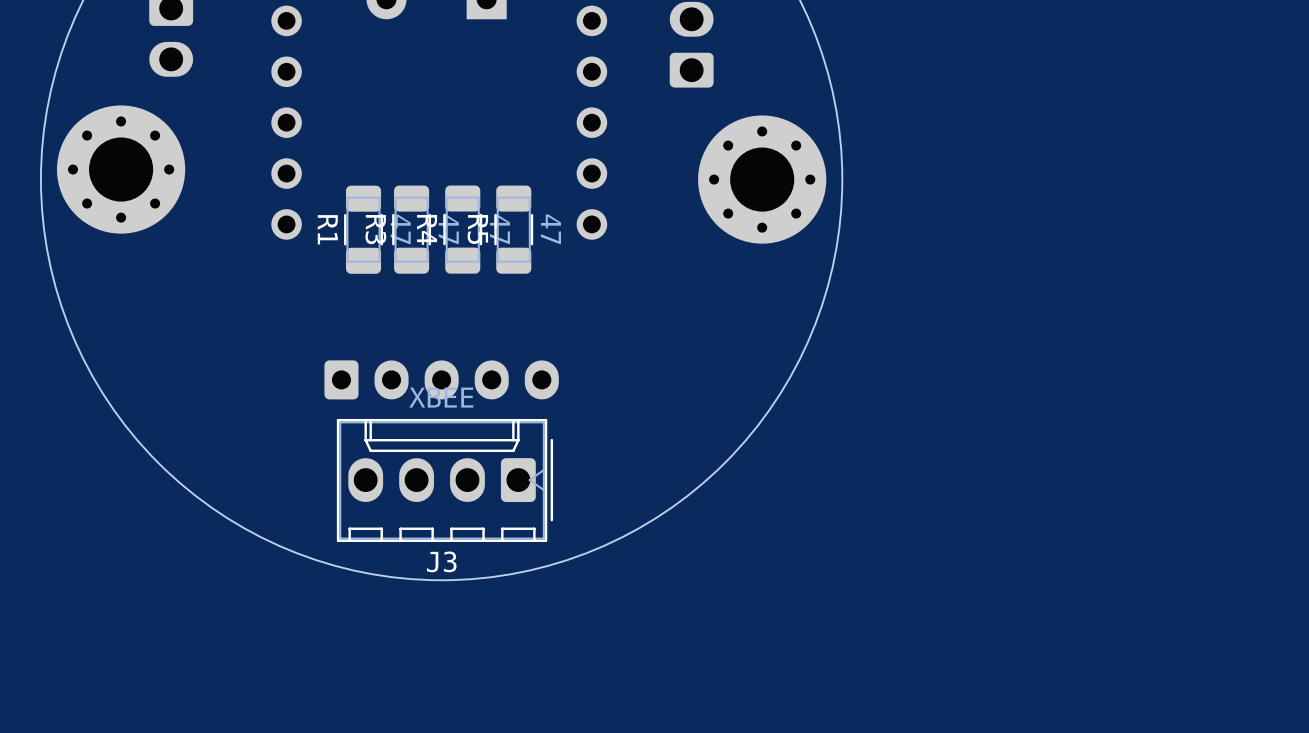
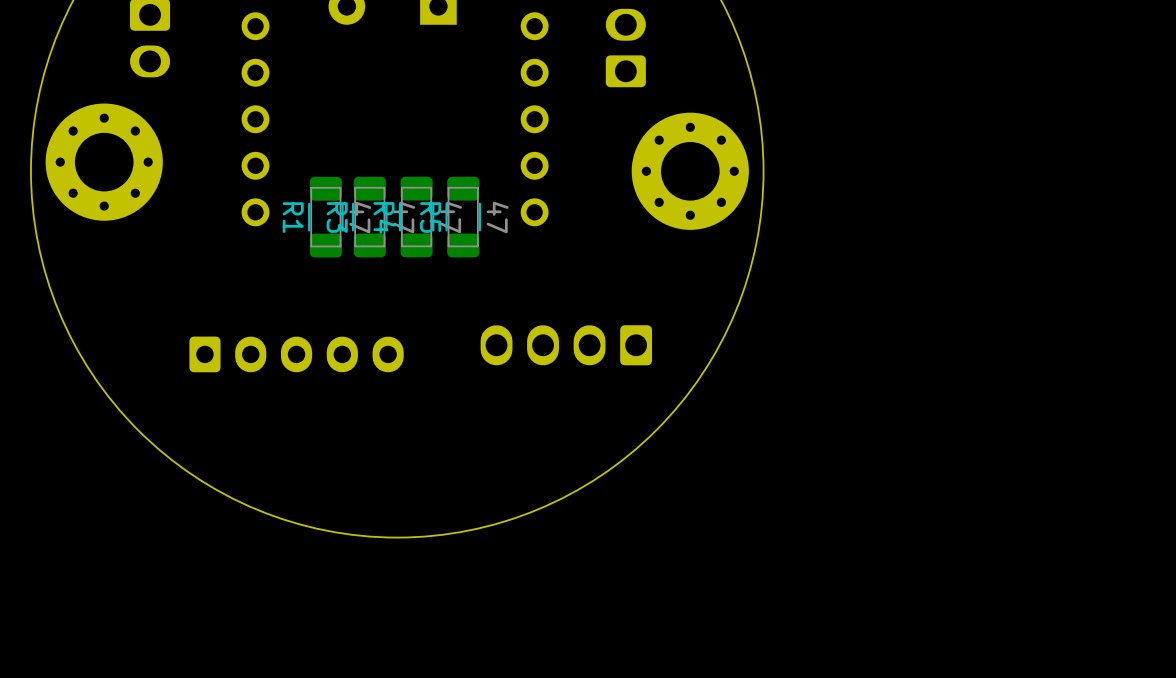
part position: (441, 379) -> (296, 354)
J3 side: bottom (444, 480) -> top (566, 345)

